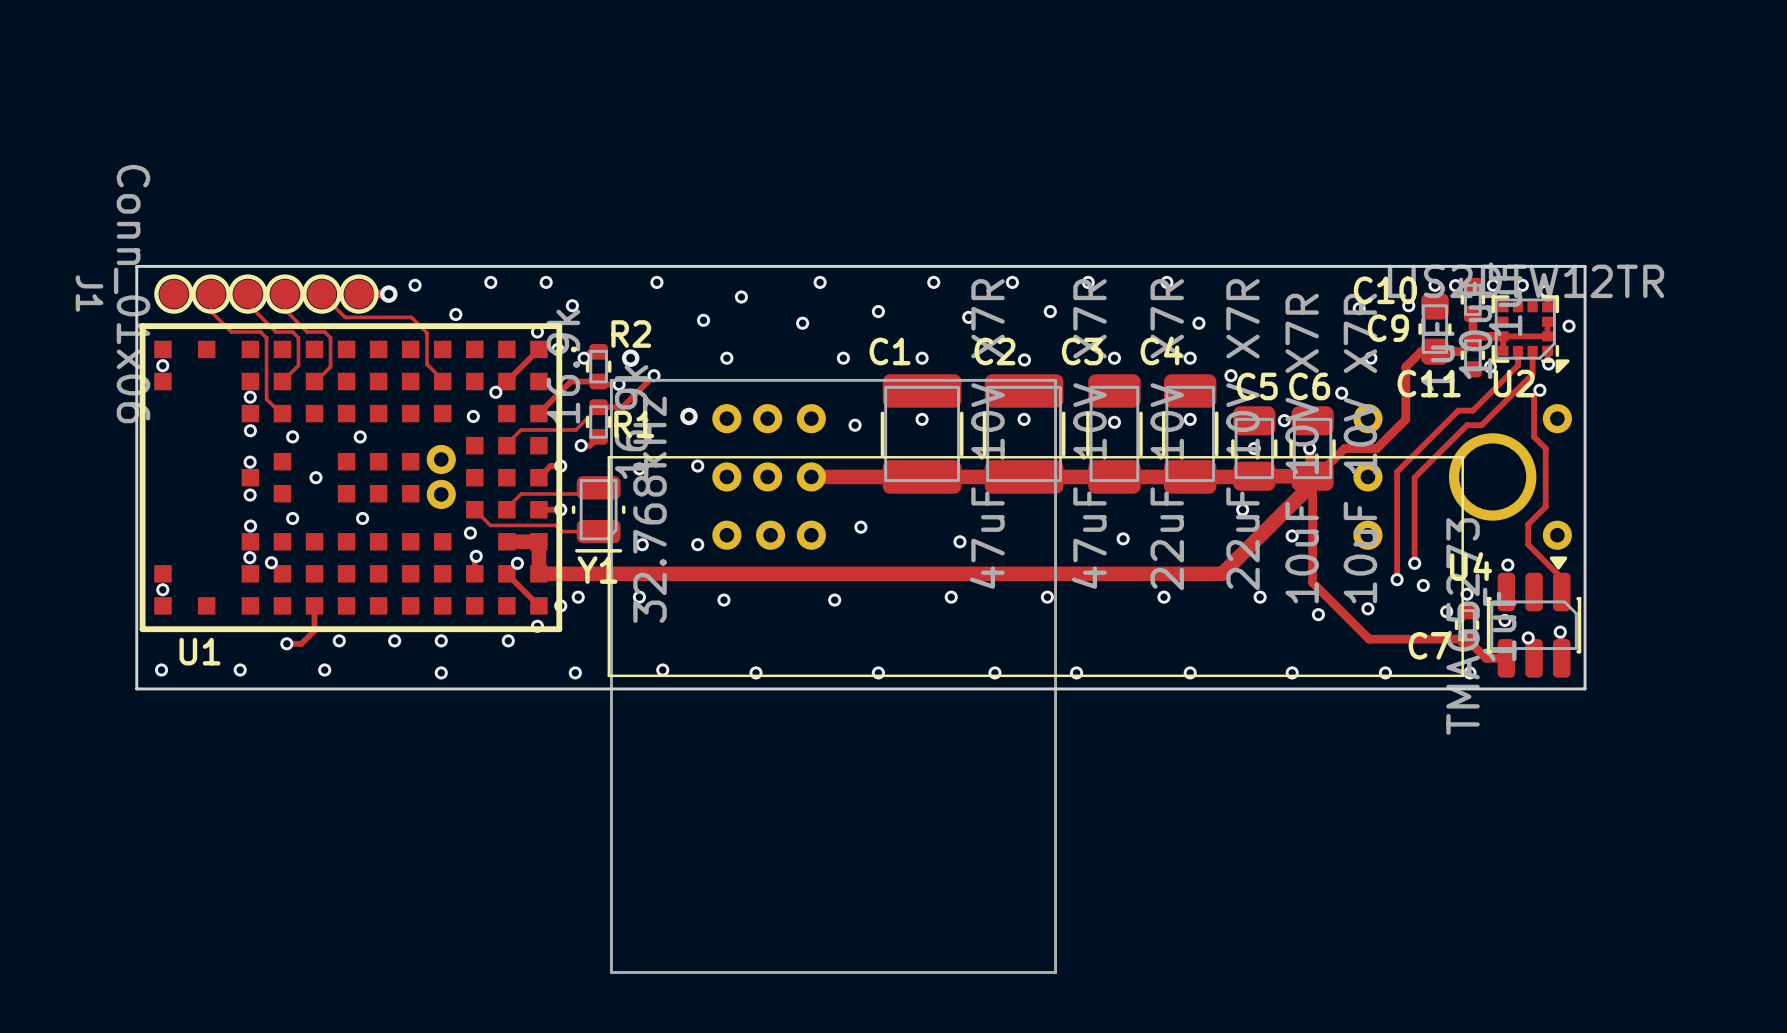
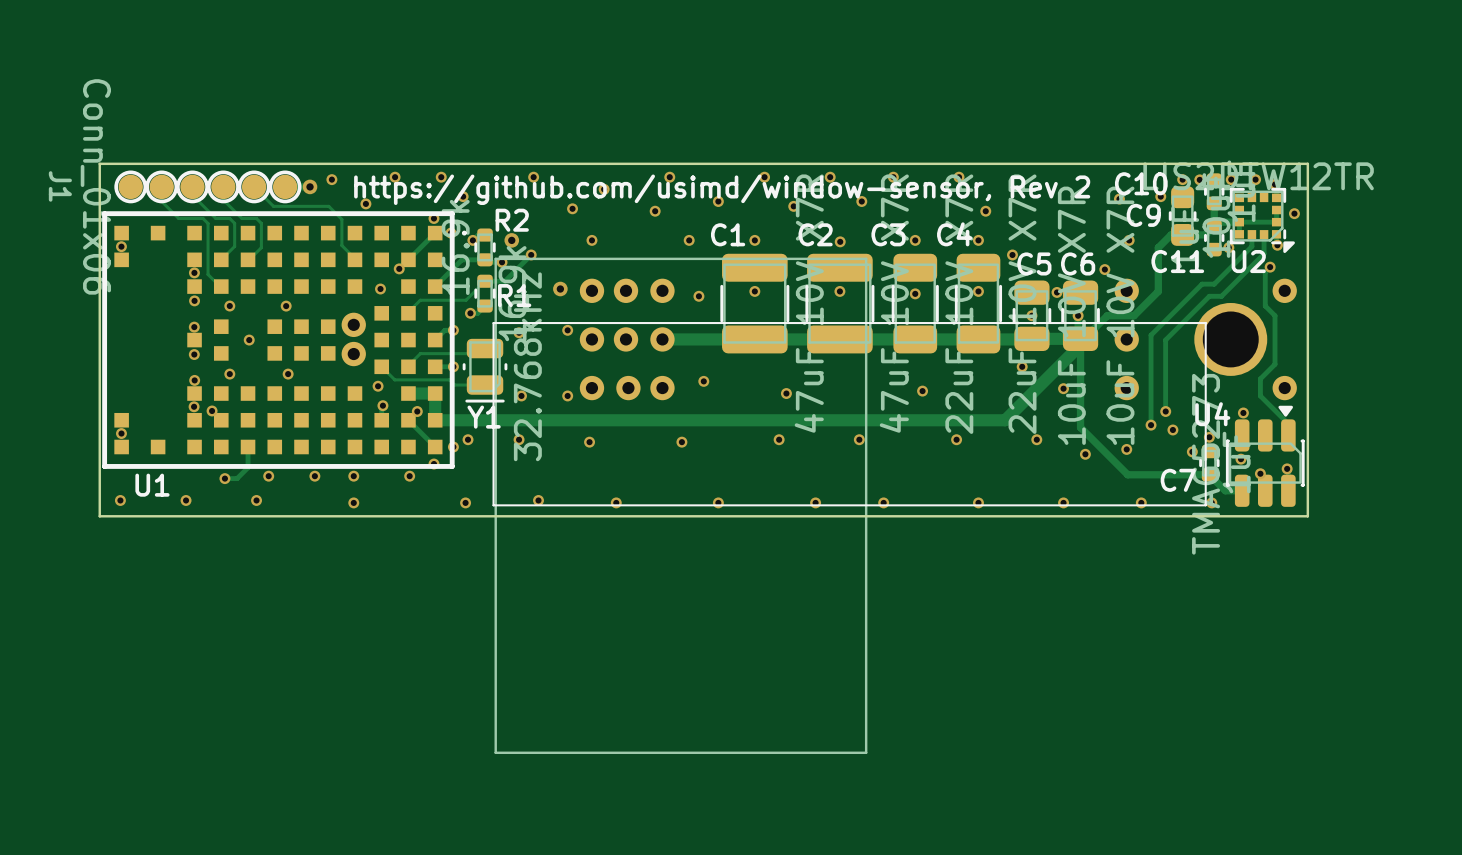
text: none -> https://github.com/usimd/window-sensor, Rev 2 (722, 189)

